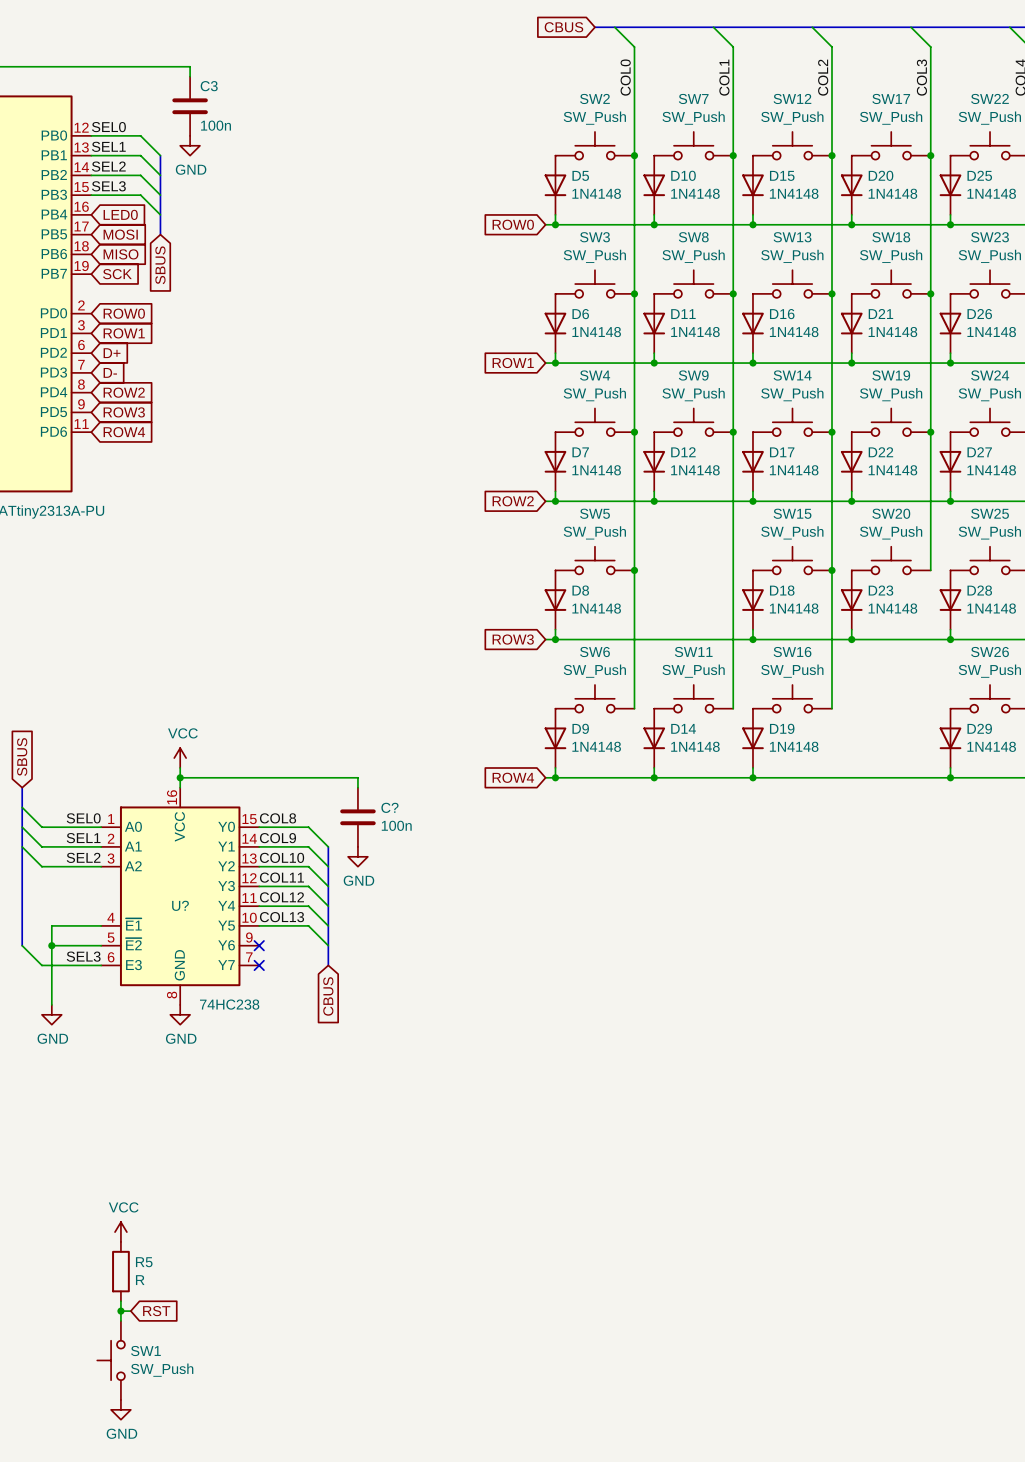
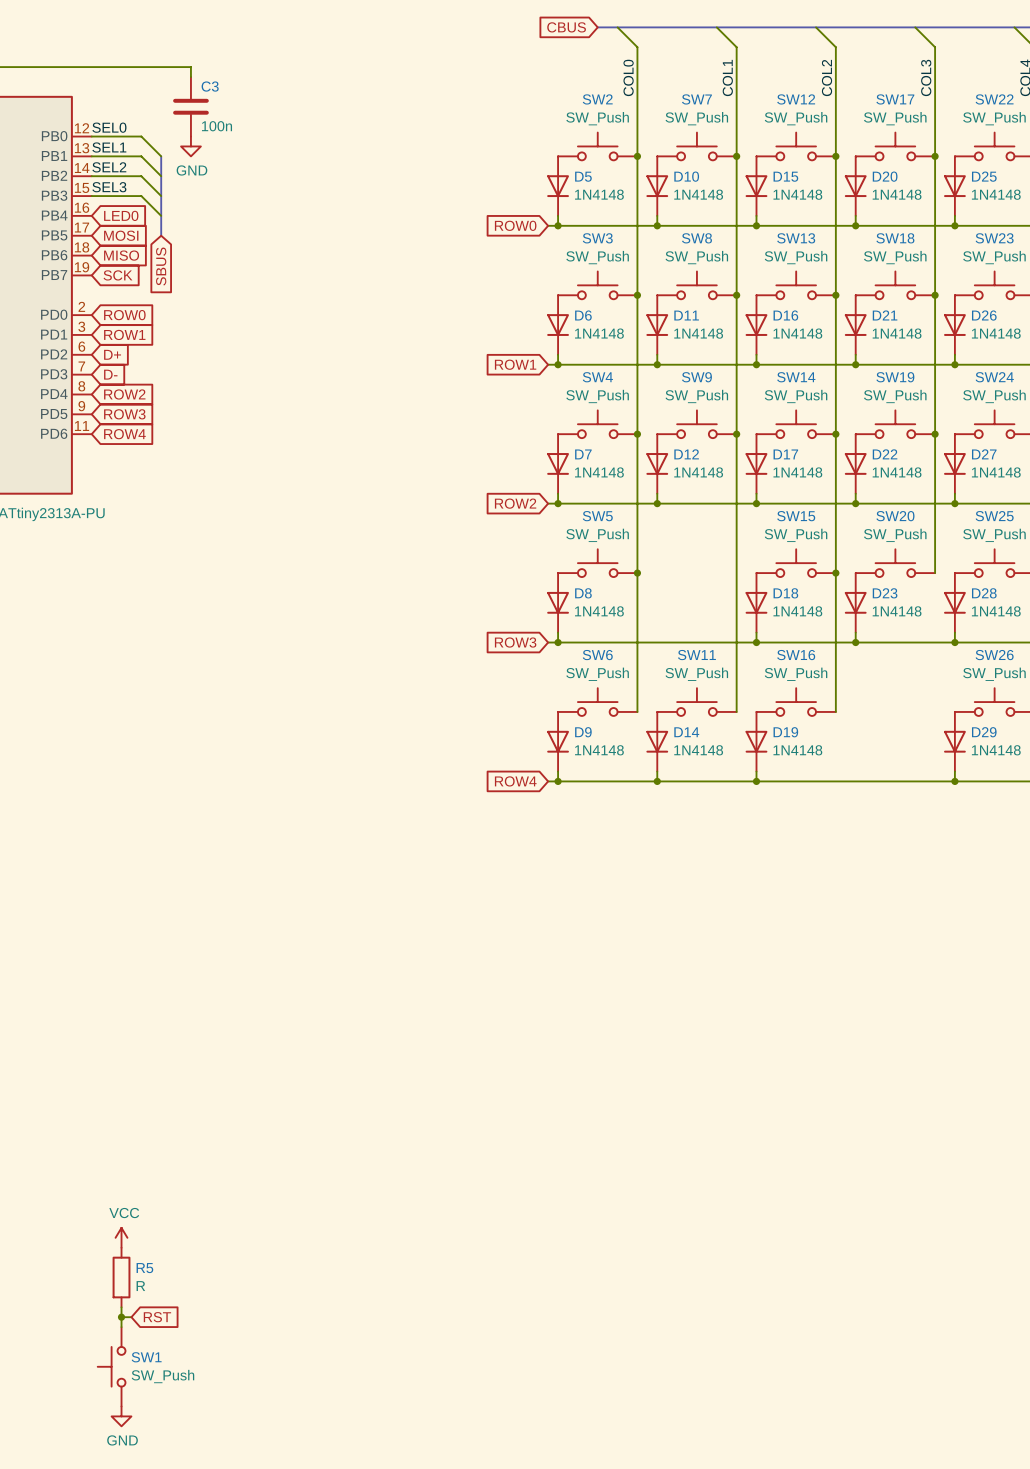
global label: SBUS (22, 757) -> none
power symbol: VCC (180, 758) -> none
wire: (180, 767) (180, 787) -> none
wire: (180, 777) (357, 777) (357, 787) -> none
junction: (180, 777) -> none
bus: (22, 787) (22, 945) -> none
wire: (22, 807) (41, 827) (101, 827) -> none
C?: 100n (357, 817) -> none
label: SEL0 (83, 818) -> none
label: COL8 (278, 818) -> none
wire: (22, 827) (41, 846) (101, 846) -> none
wire: (259, 827) (308, 827) (328, 846) -> none
label: SEL1 (83, 838) -> none
label: COL9 (277, 838) -> none
wire: (22, 846) (41, 866) (101, 866) -> none
wire: (259, 846) (308, 846) (328, 866) -> none
bus: (328, 846) (328, 965) -> none
power symbol: GND (357, 856) -> none
label: SEL2 (83, 857) -> none
label: COL10 (282, 857) -> none
wire: (259, 866) (308, 866) (328, 886) -> none
label: COL11 (281, 877) -> none
wire: (259, 886) (308, 886) (328, 906) -> none
U?: 74HC238 (180, 896) -> none
label: COL12 (281, 897) -> none
wire: (259, 906) (308, 906) (328, 925) -> none
label: COL13 (282, 917) -> none
wire: (101, 925) (51, 925) (51, 1004) -> none
wire: (259, 925) (308, 925) (328, 945) -> none
wire: (22, 945) (41, 965) (101, 965) -> none
wire: (51, 945) (101, 945) -> none
junction: (51, 945) -> none
no-connect mark: (259, 945) -> none
label: SEL3 (83, 956) -> none
no-connect mark: (259, 965) -> none
global label: CBUS (328, 996) -> none
power symbol: GND (51, 1014) -> none
power symbol: GND (180, 1014) -> none

